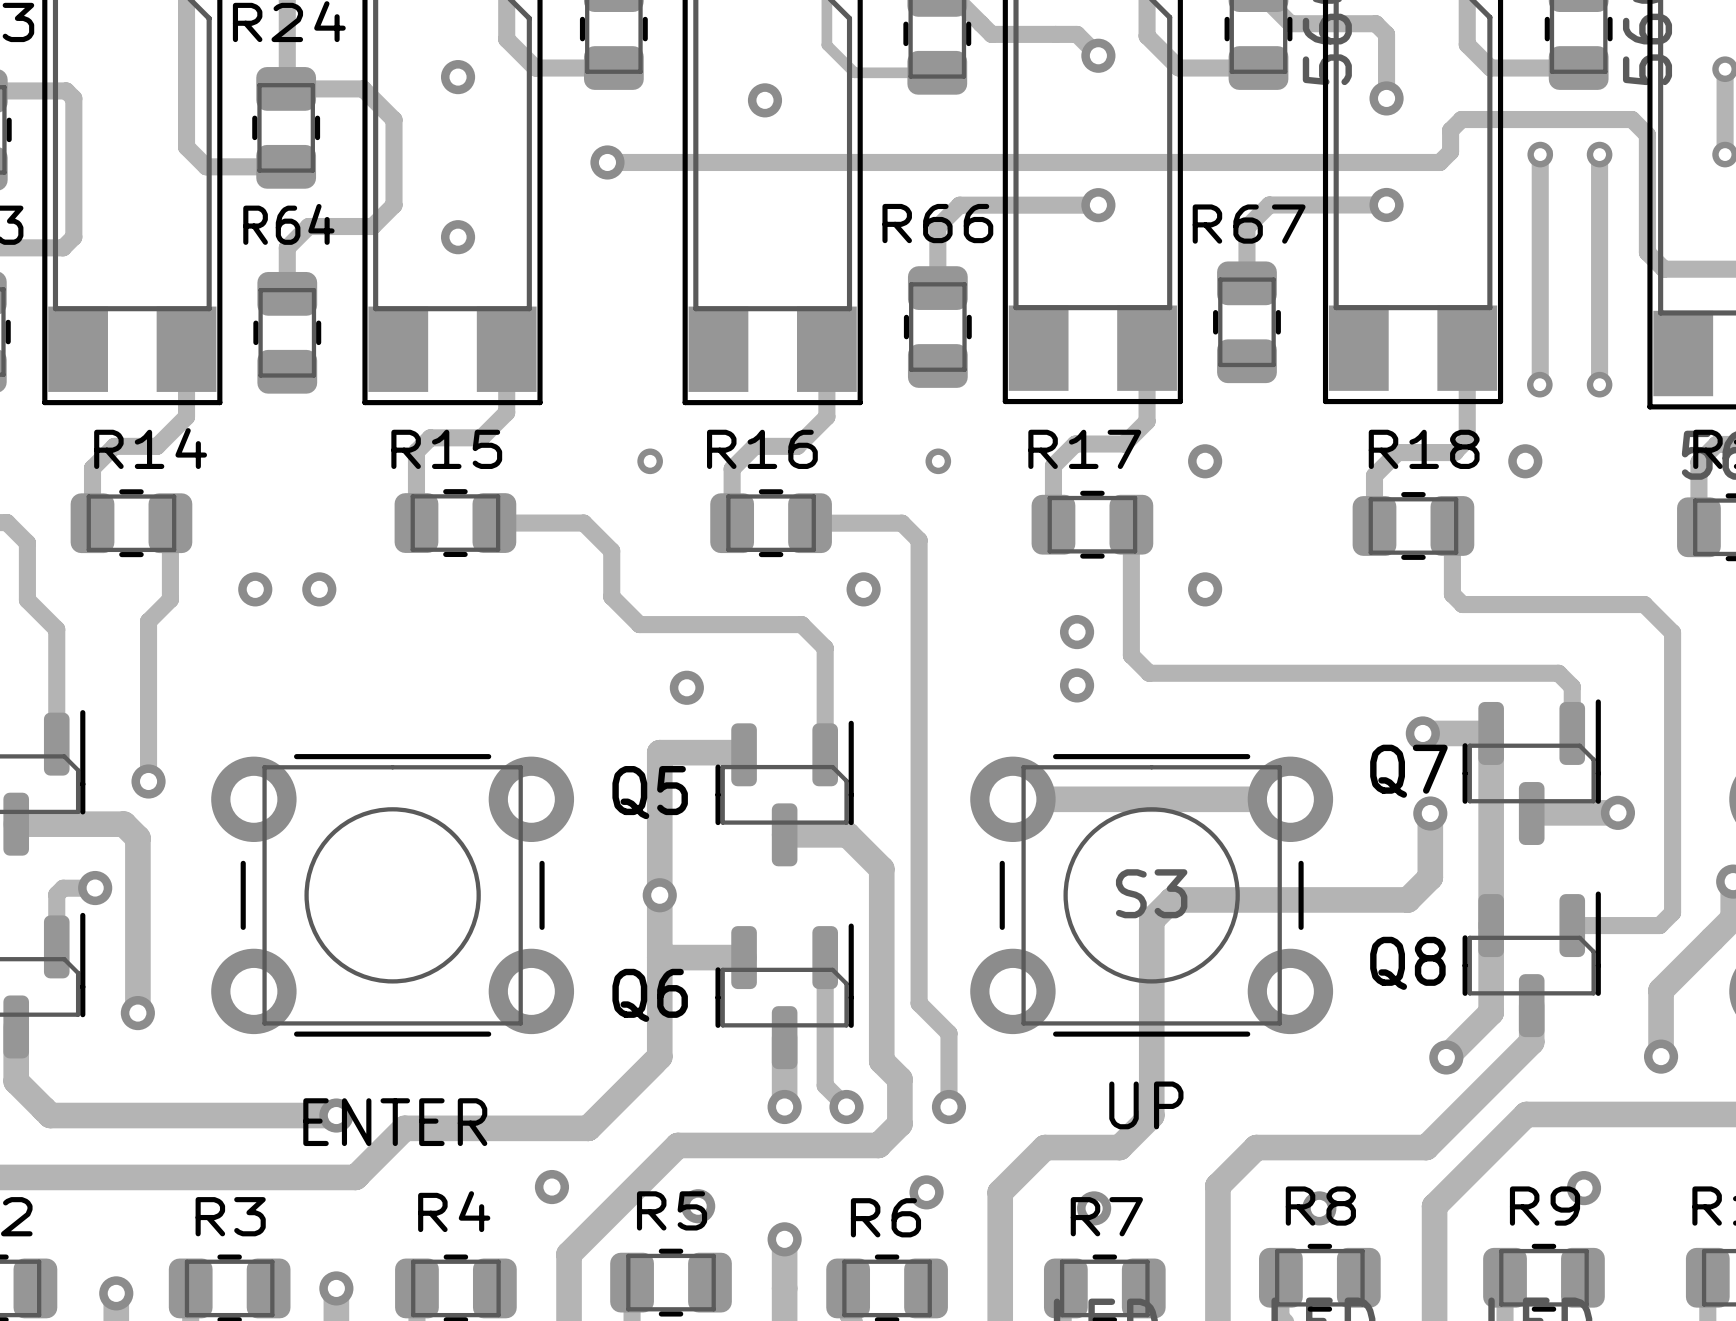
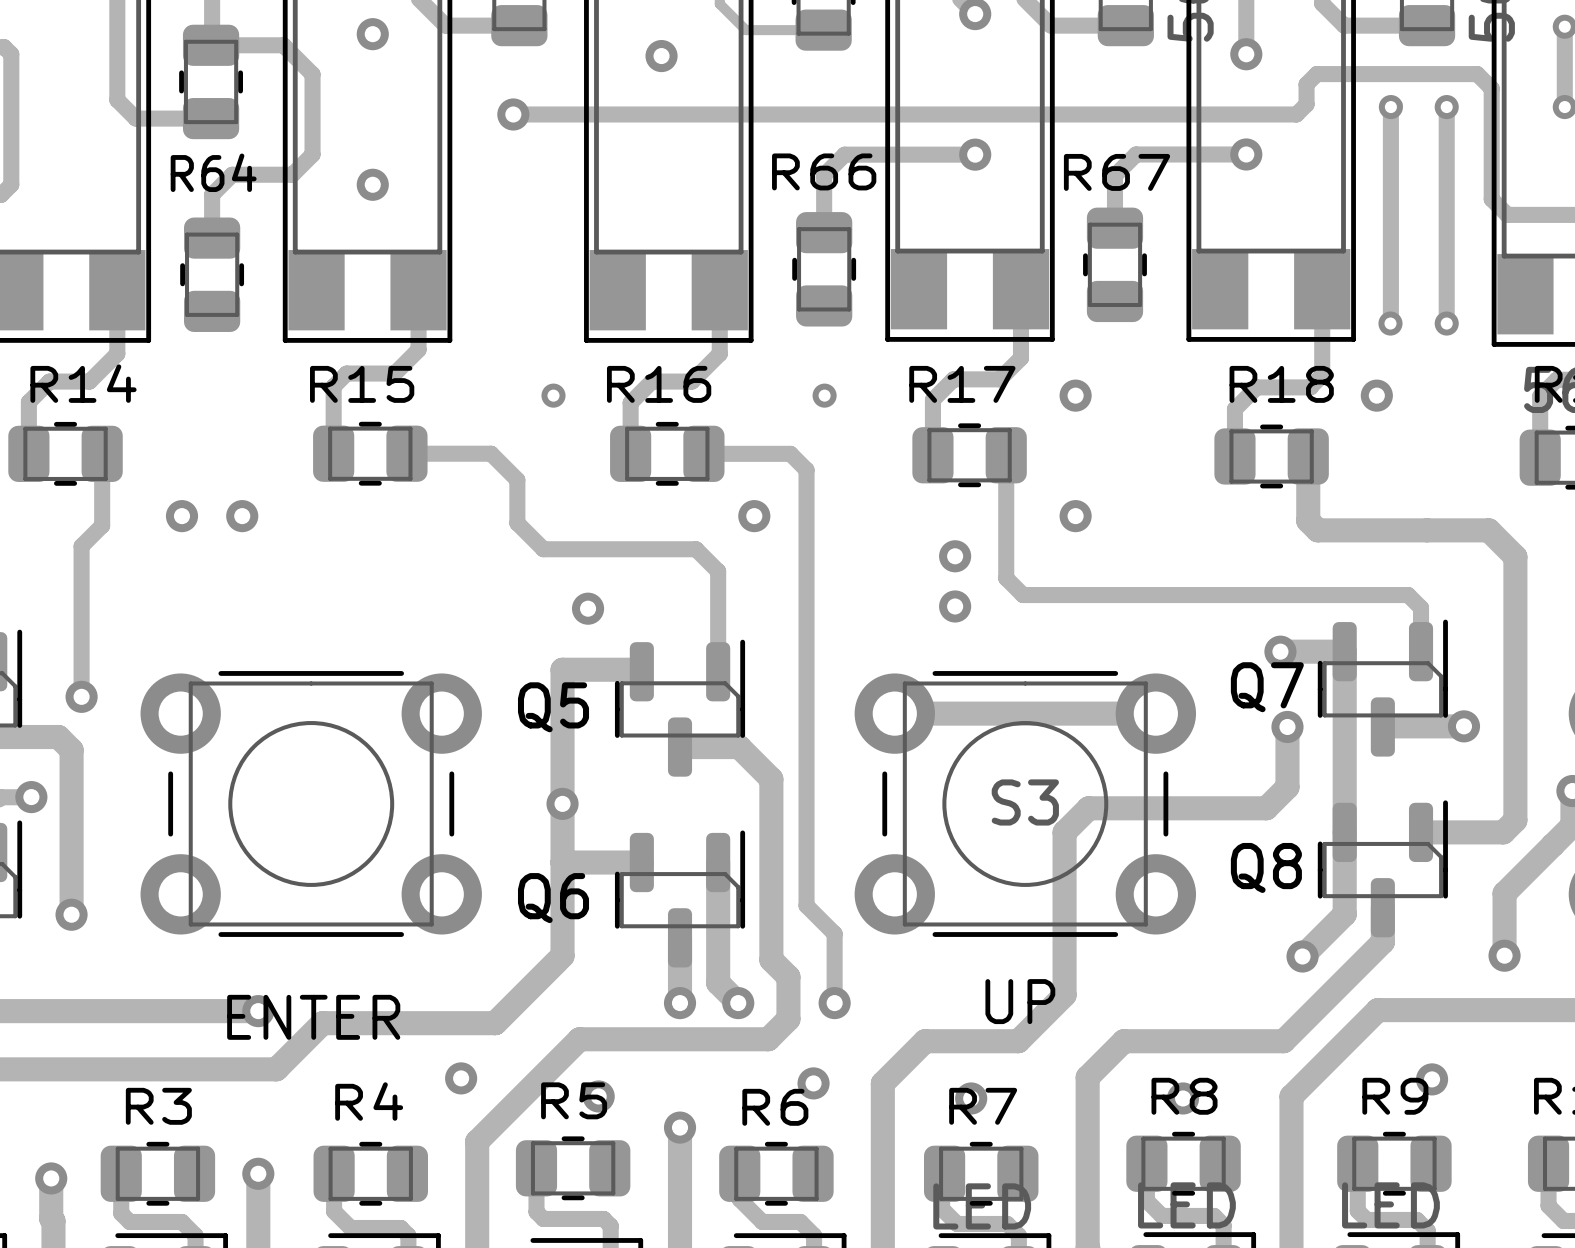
track width: thin (1452, 525) (1452, 594) (1462, 604) (1644, 604) (1672, 632) (1672, 912) (1659, 925) (1572, 925) -> thick (1308, 456) (1308, 520) (1317, 530) (1488, 530) (1515, 556) (1515, 820) (1503, 832) (1421, 832)
track: (1219, 899) (1172, 899) (1151, 920) (1151, 1115) (1119, 1147) -> (1088, 808) (1064, 832) (1064, 995) (1018, 1041) (995, 1041)
track width: thin (825, 957) (825, 1085) (841, 1101) -> thick (718, 862) (718, 983) (733, 998)

